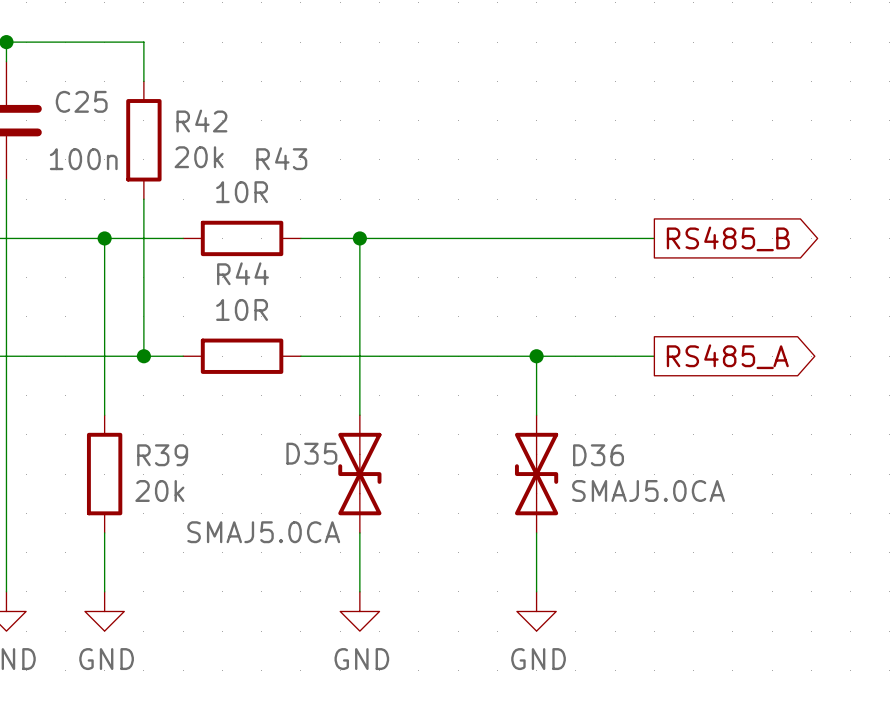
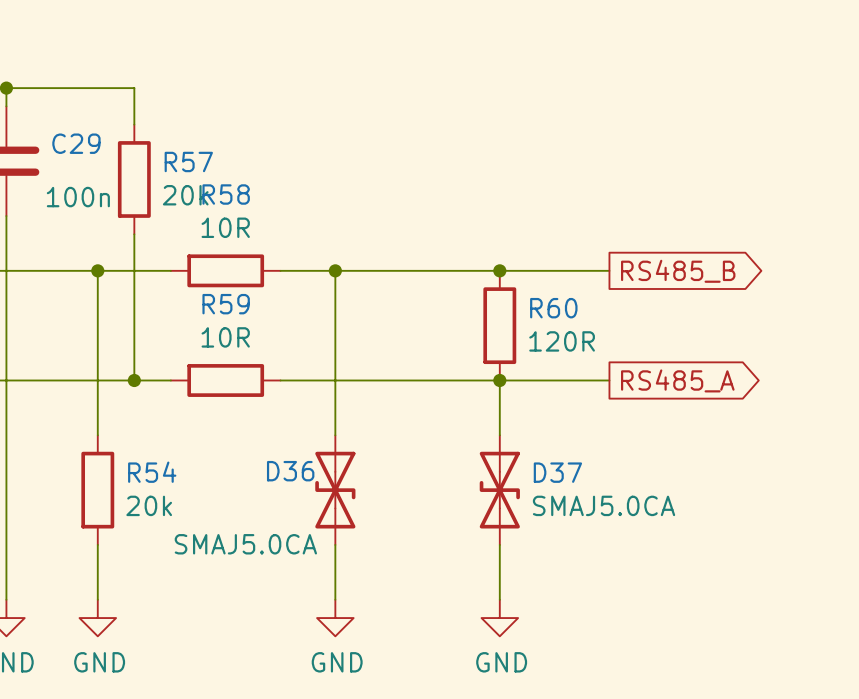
C25 name: C25 (81, 101) -> C29 (76, 143)
R42 name: R42 (201, 121) -> R57 (188, 161)
R43 name: R43 (281, 158) -> R58 (226, 194)
junction: none -> (499, 270)
R44 name: R44 (243, 273) -> R59 (226, 304)
R60: none -> 120R (499, 325)
D35 name: D35 (311, 453) -> D36 (290, 471)
R39 name: R39 (162, 455) -> R54 (152, 472)
D36 name: D36 (598, 455) -> D37 (557, 472)

